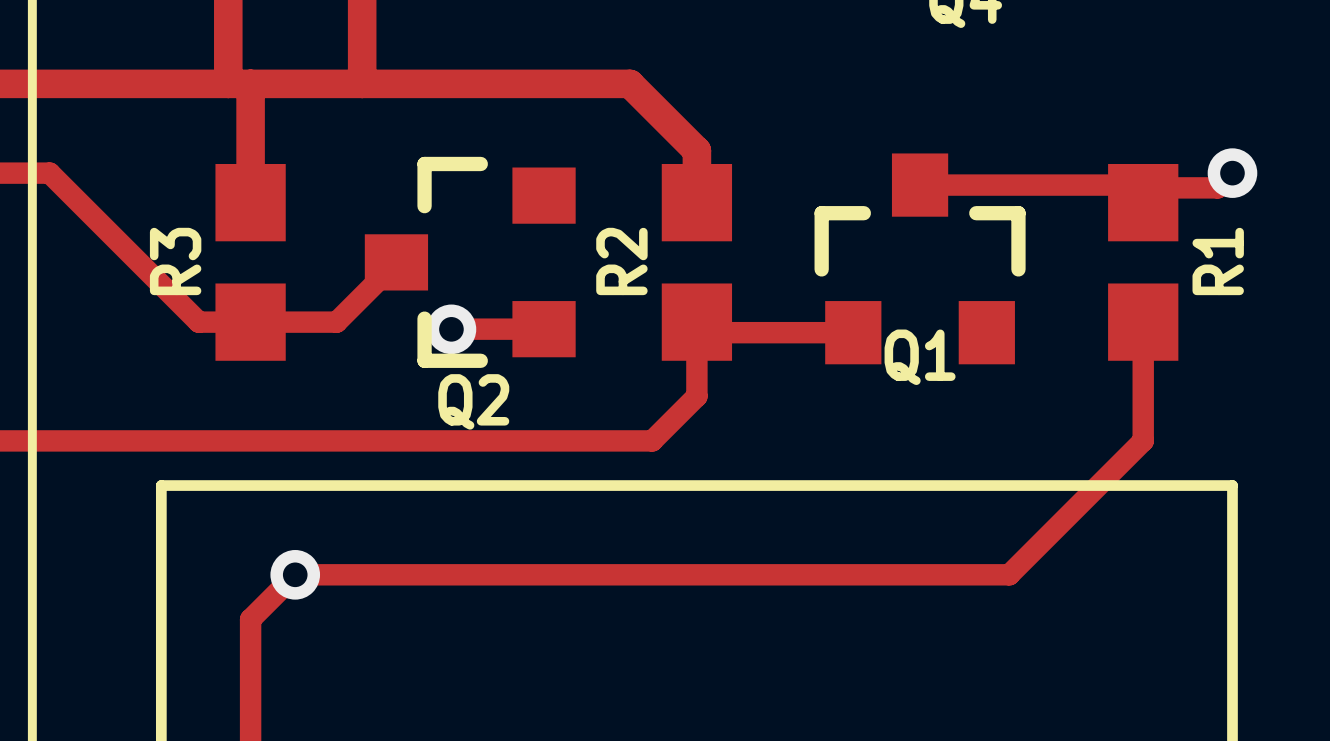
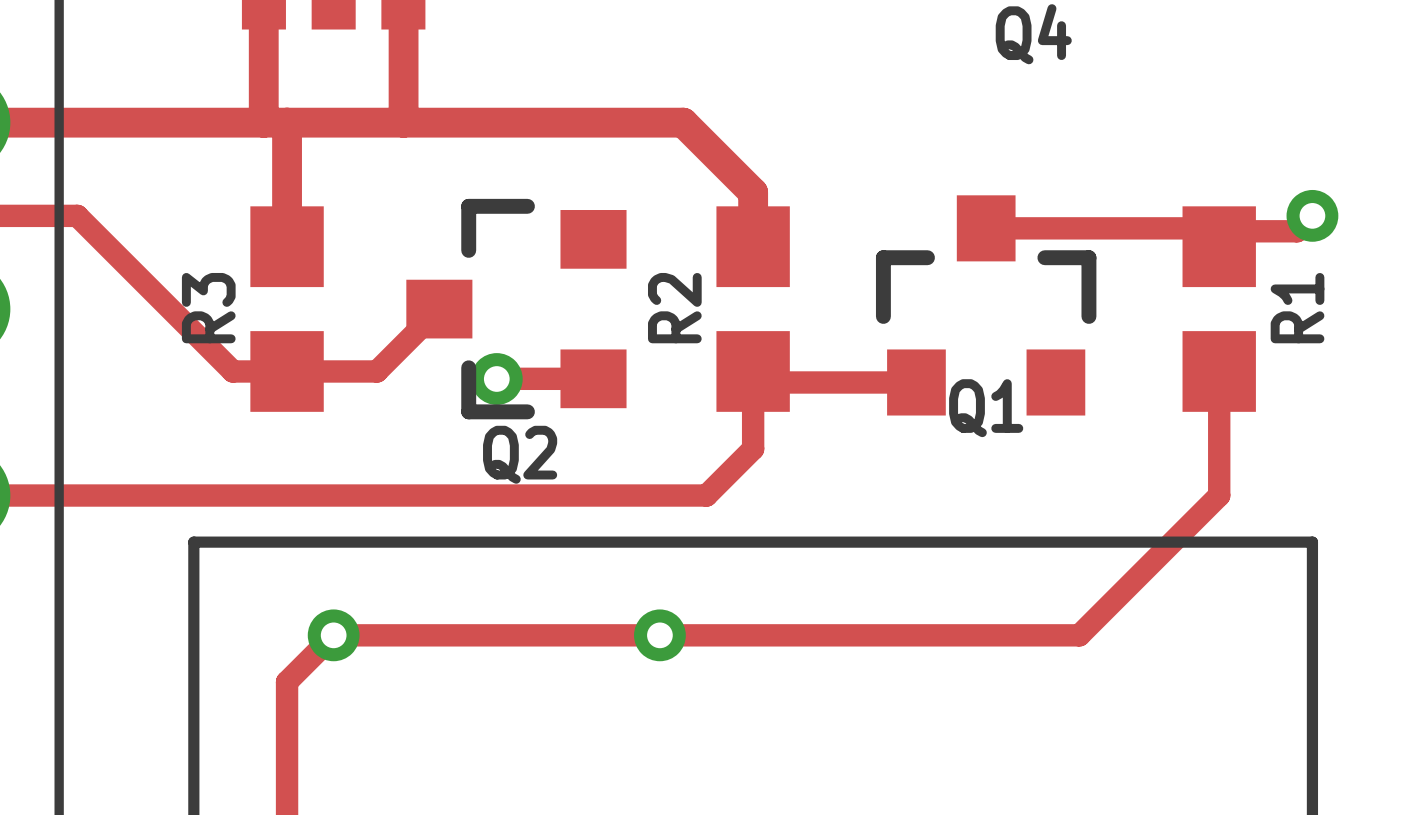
via: none -> (659, 635)

